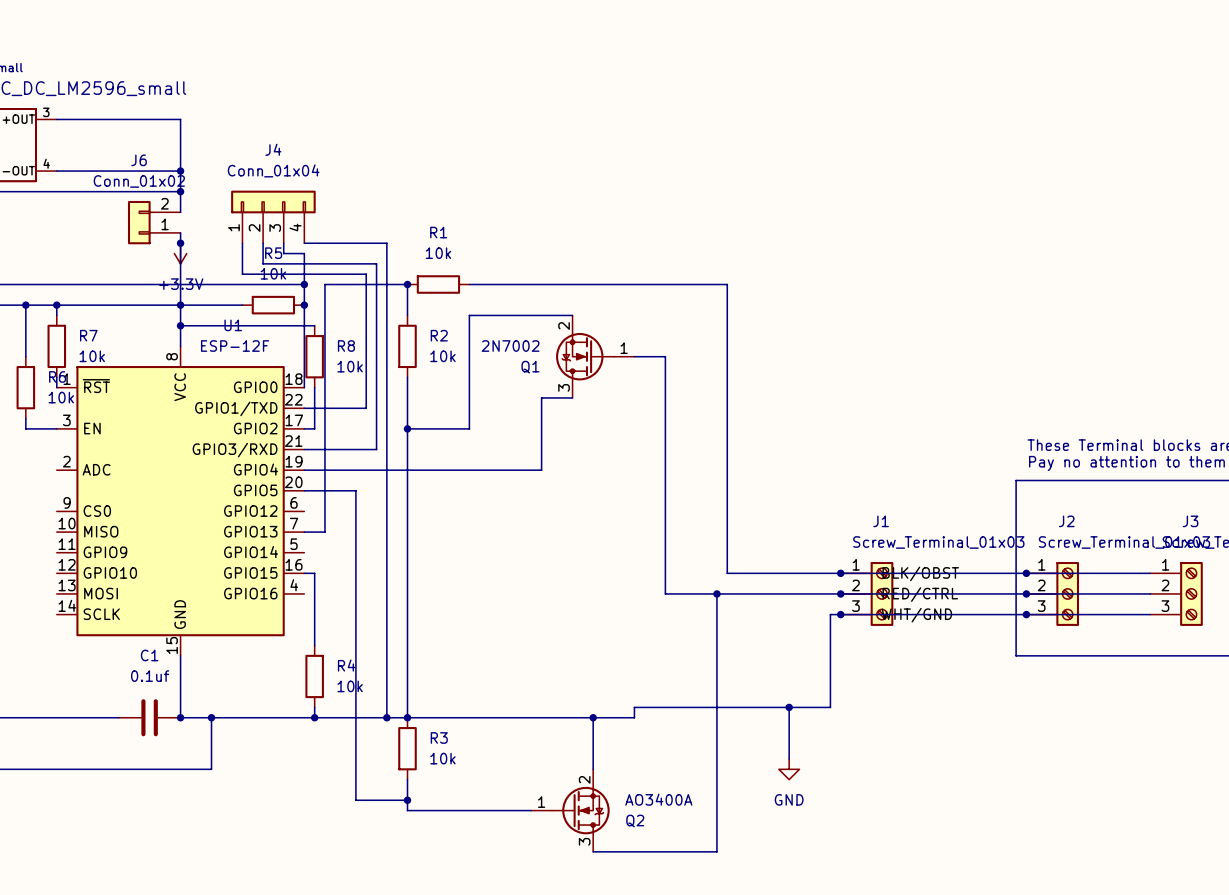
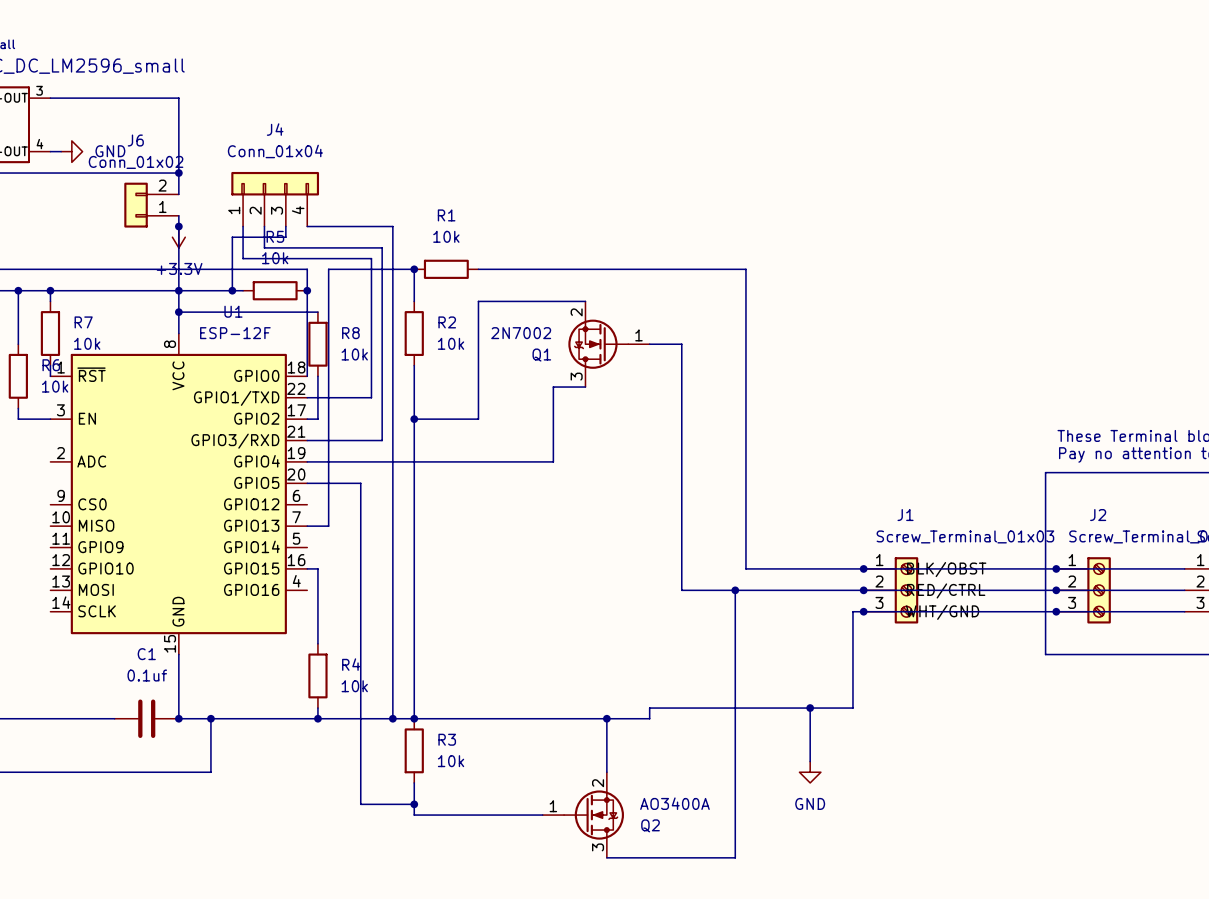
wire: (67, 171) (180, 171) -> none
power symbol: none -> GND (71, 151)
junction: (180, 171) -> none
wire: (283, 253) (304, 253) (304, 284) -> (285, 237) (232, 237) (232, 290)
junction: (304, 284) -> none
junction: none -> (232, 290)

